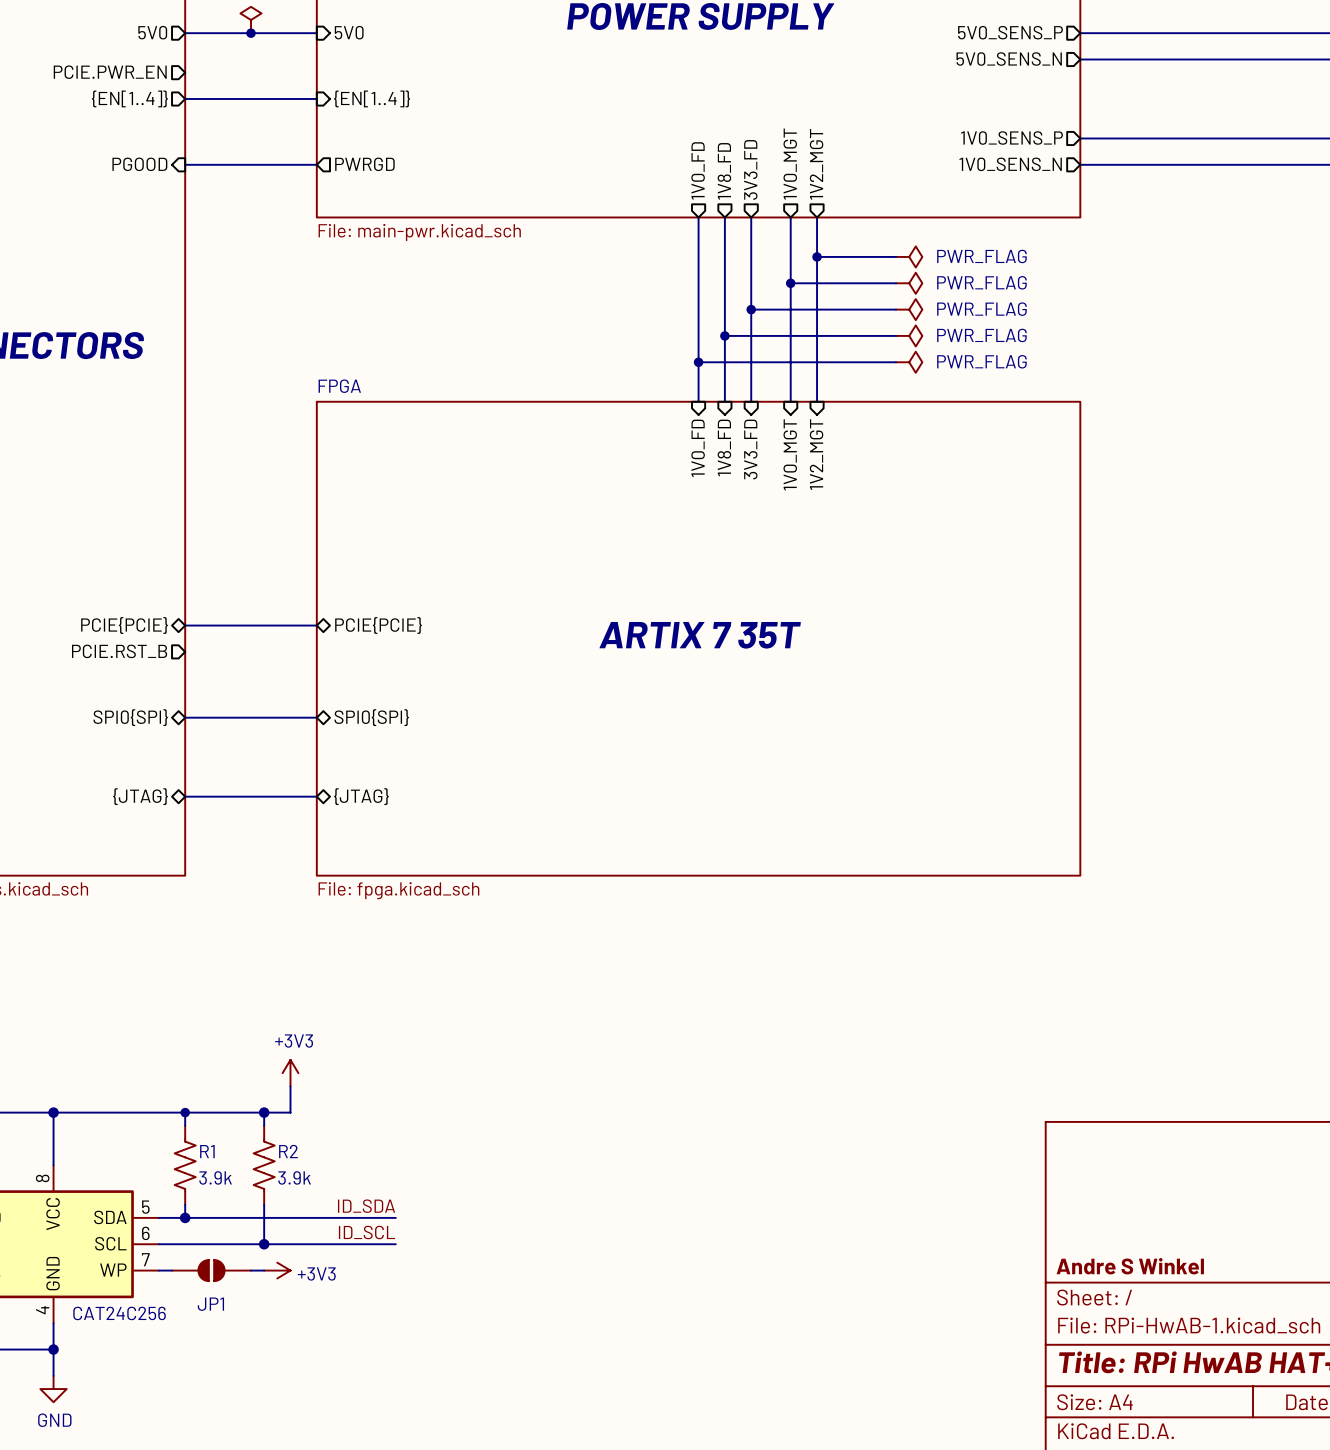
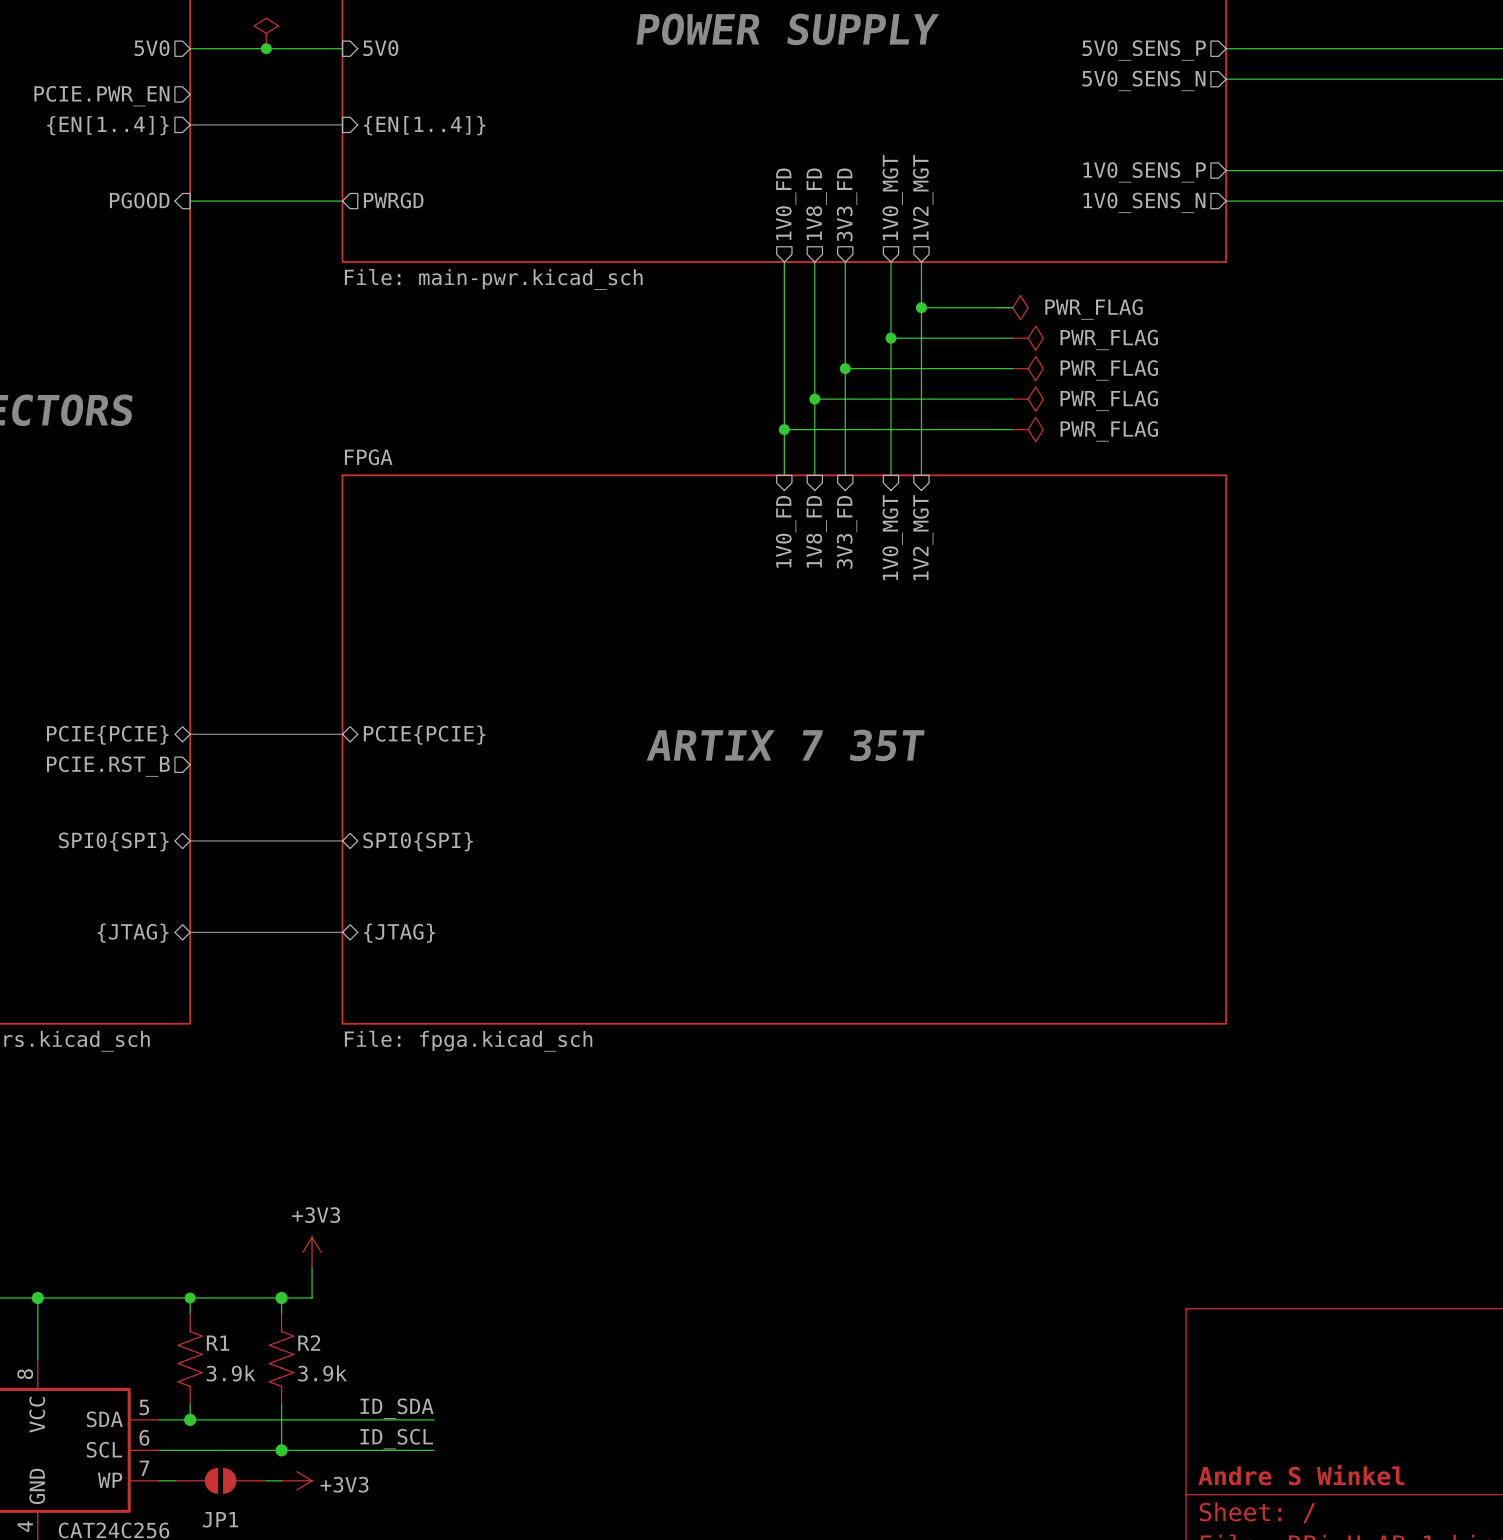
power symbol position: PWR_FLAG (909, 256) -> PWR_FLAG (1012, 307)

